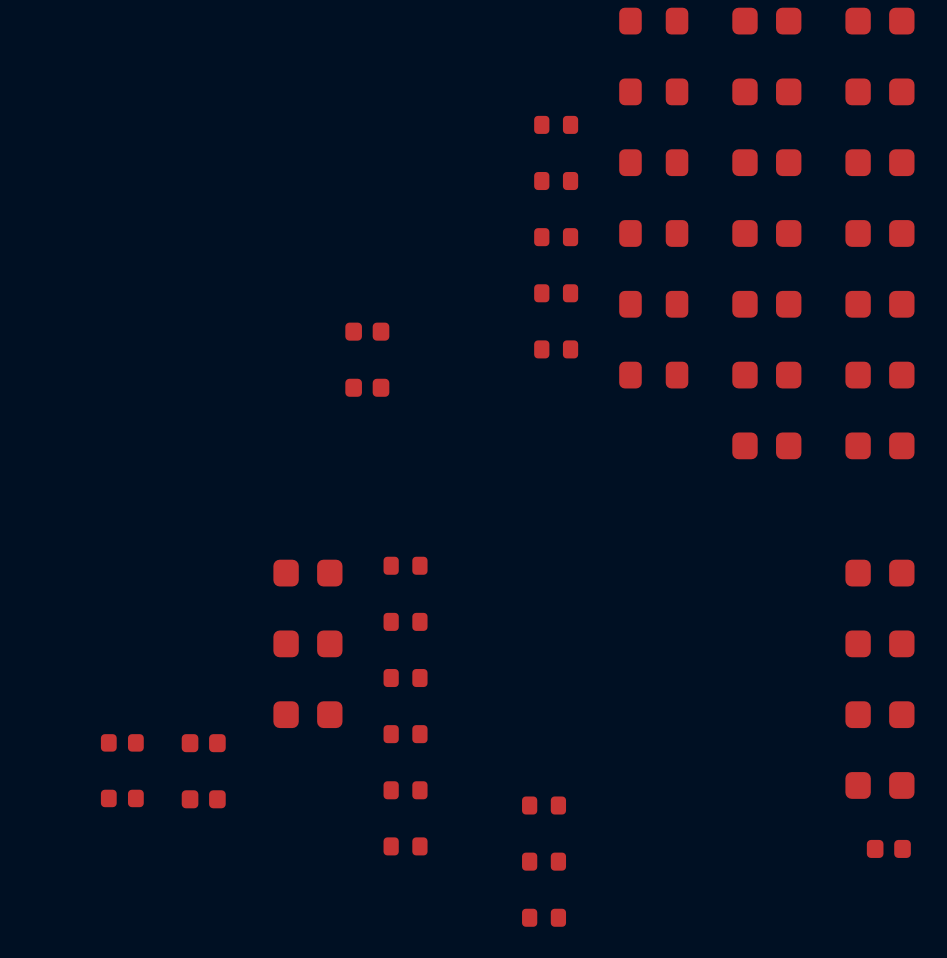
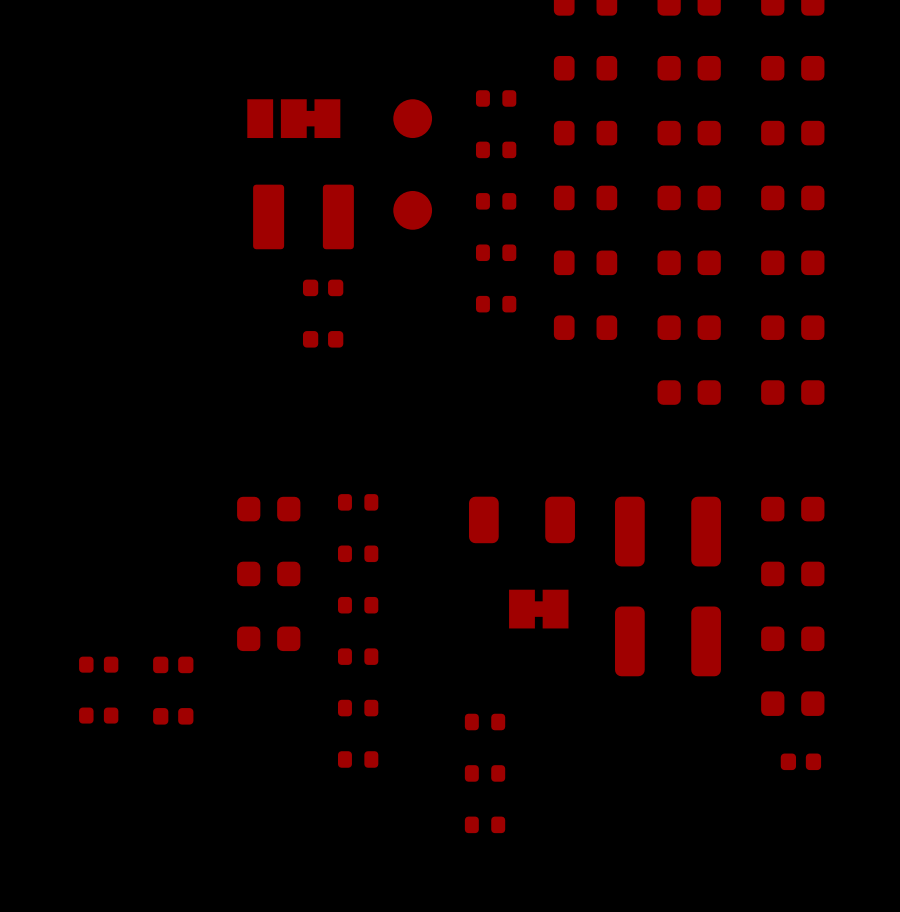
part: none -> (293, 118)
part: none -> (412, 118)
part: none -> (412, 210)
part: none -> (303, 216)
part: none -> (521, 519)
part: none -> (667, 531)
part: none -> (538, 609)
part: none -> (667, 641)

